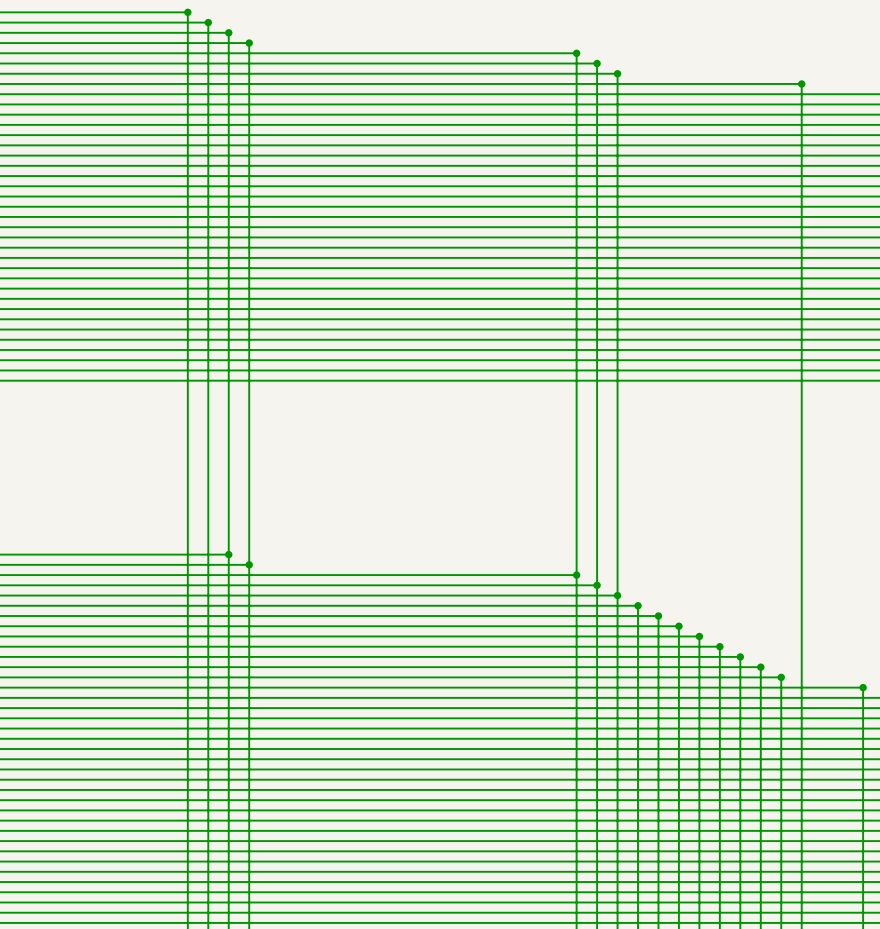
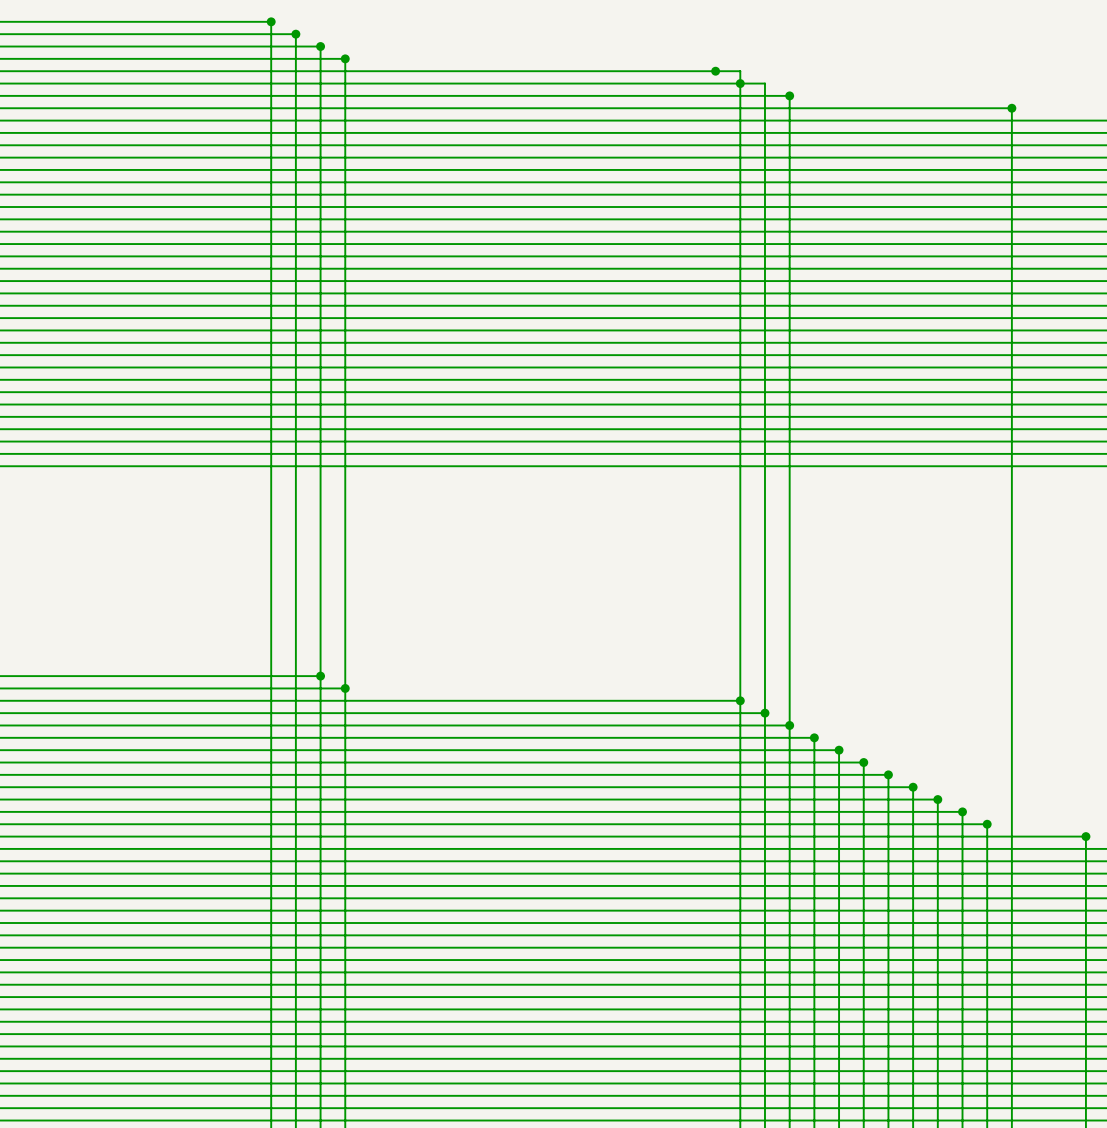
junction: none -> (715, 71)
junction: (576, 53) -> none
junction: none -> (740, 83)
junction: (597, 63) -> none

